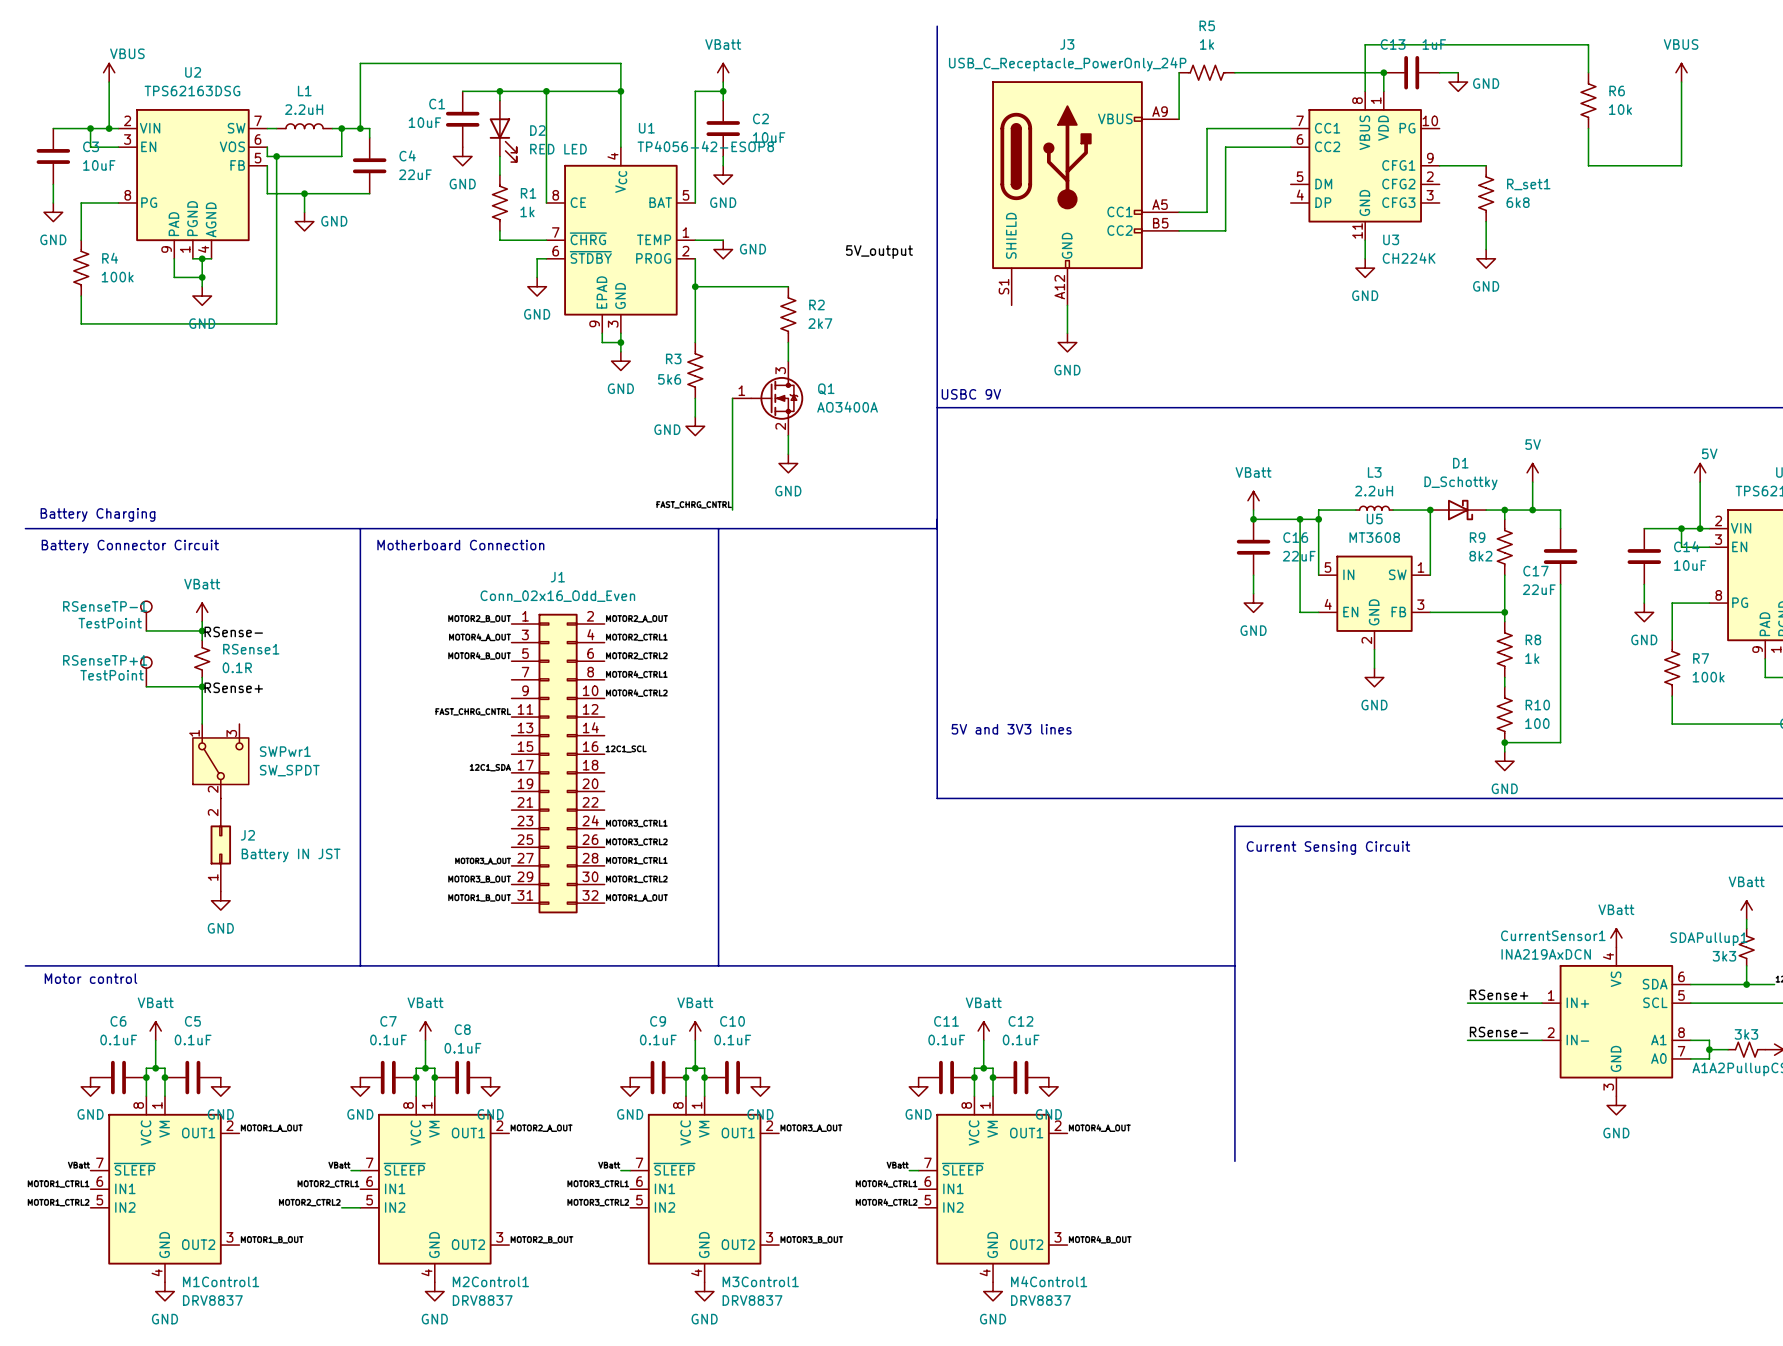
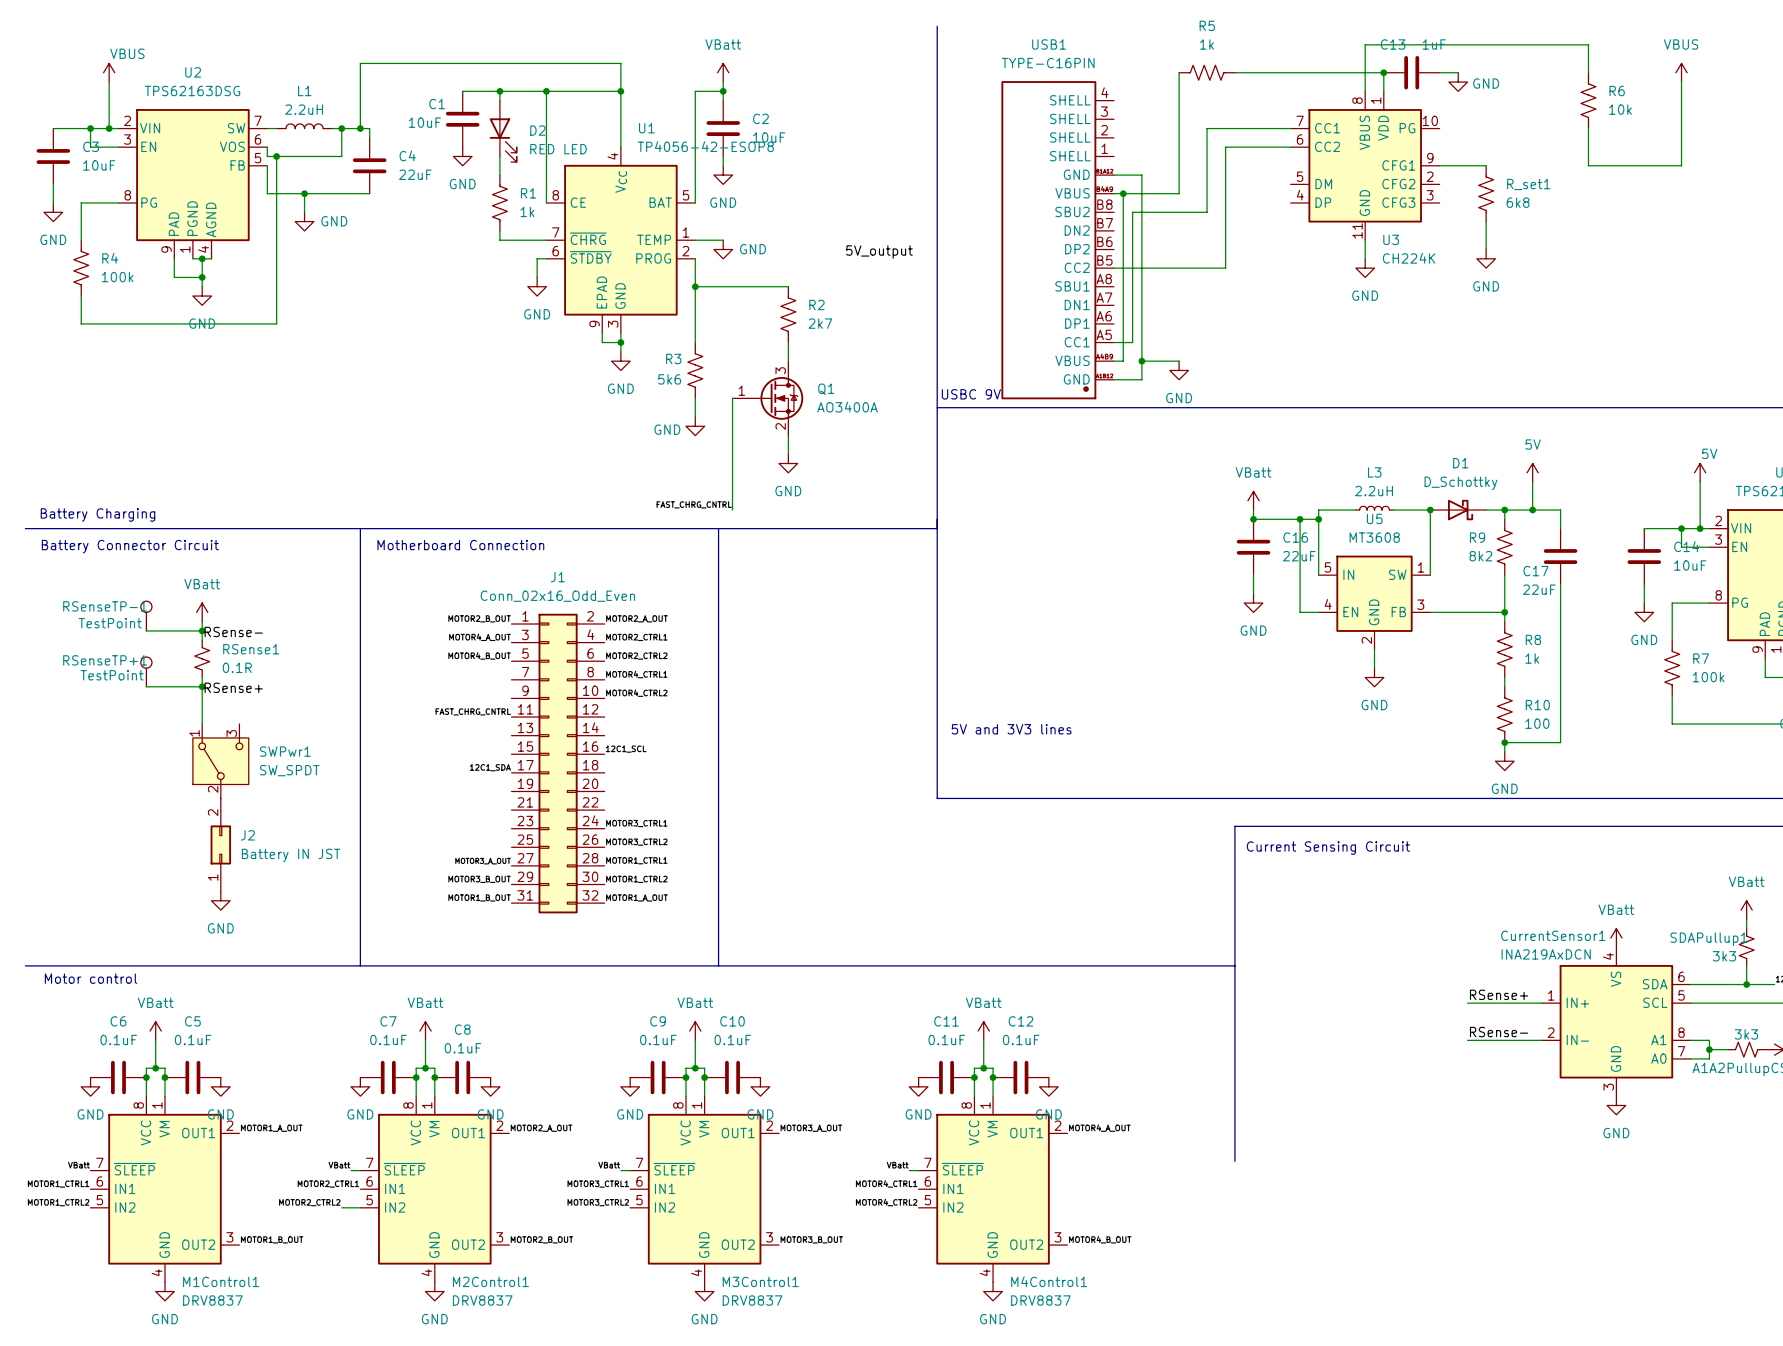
wire: none -> (1179, 119) (1179, 193) (1113, 193)
wire: none -> (1113, 175) (1141, 175) (1141, 379) (1113, 379)
J3: USB_C_Receptacle_PowerOnly_24P (1085, 193) -> none
wire: none -> (1123, 193) (1123, 361) (1113, 361)
junction: none -> (1123, 193)
wire: none -> (1179, 212) (1132, 212) (1132, 342) (1113, 342)
wire: (1179, 230) (1225, 230) -> (1113, 268) (1225, 268) (1225, 230)
USB1: none -> TYPE-C16PIN (1057, 240)
wire: (1067, 305) (1067, 333) -> none
power symbol position: GND (1067, 342) -> GND (1179, 370)
wire: none -> (1141, 361) (1179, 361)
junction: none -> (1141, 361)

